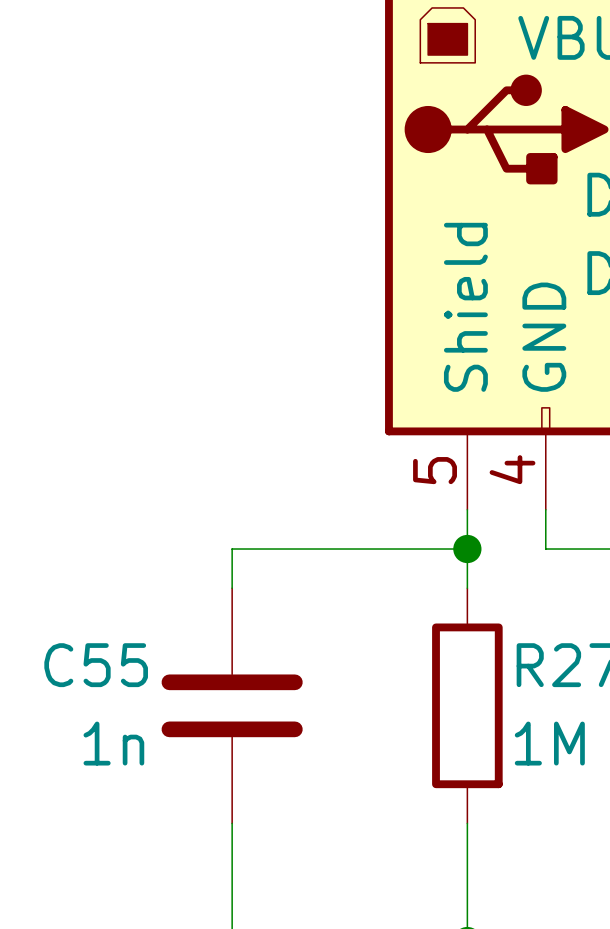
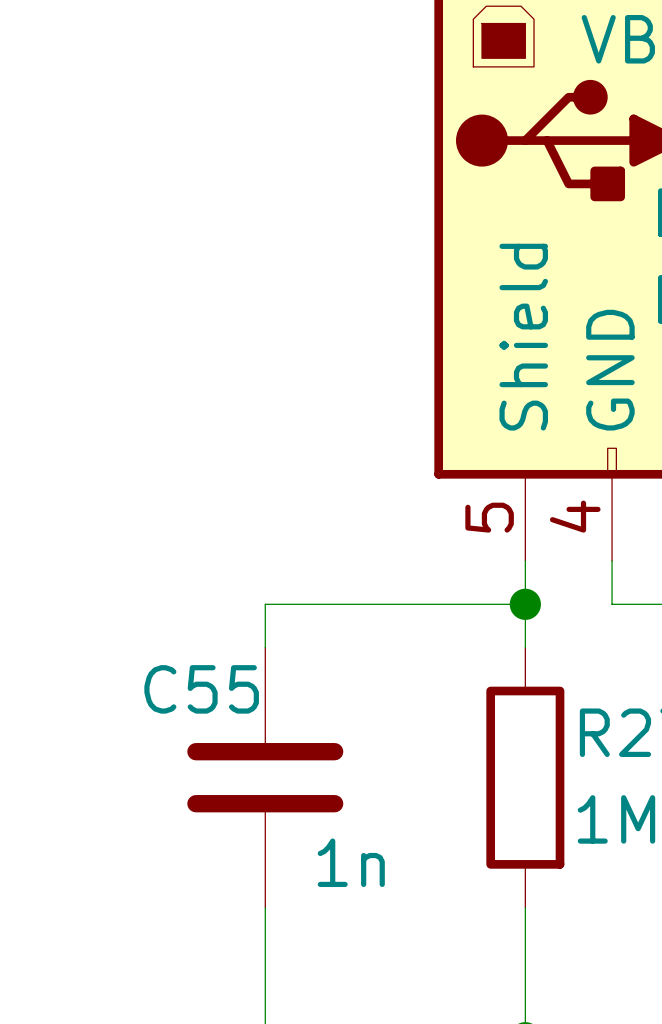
C55 name position: C55 (96, 665) -> C55 (201, 689)
C55 value position: 1n (113, 743) -> 1n (351, 862)

